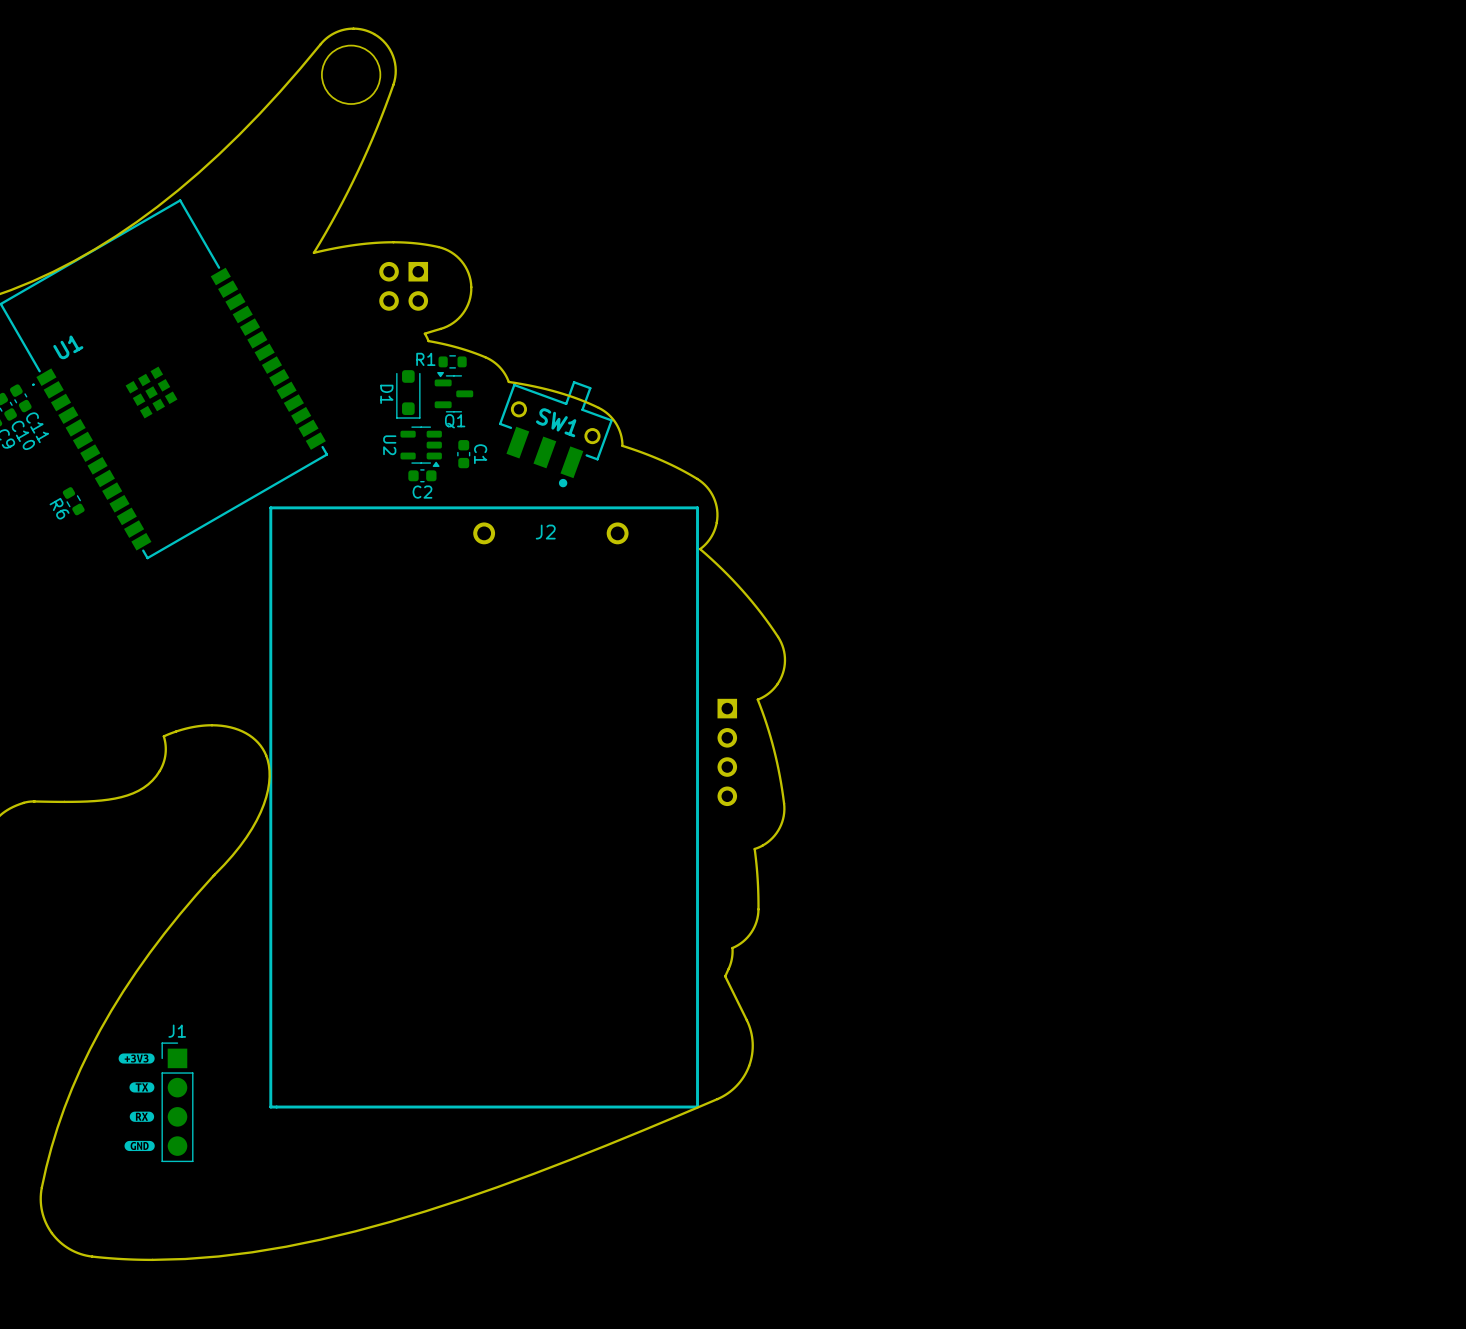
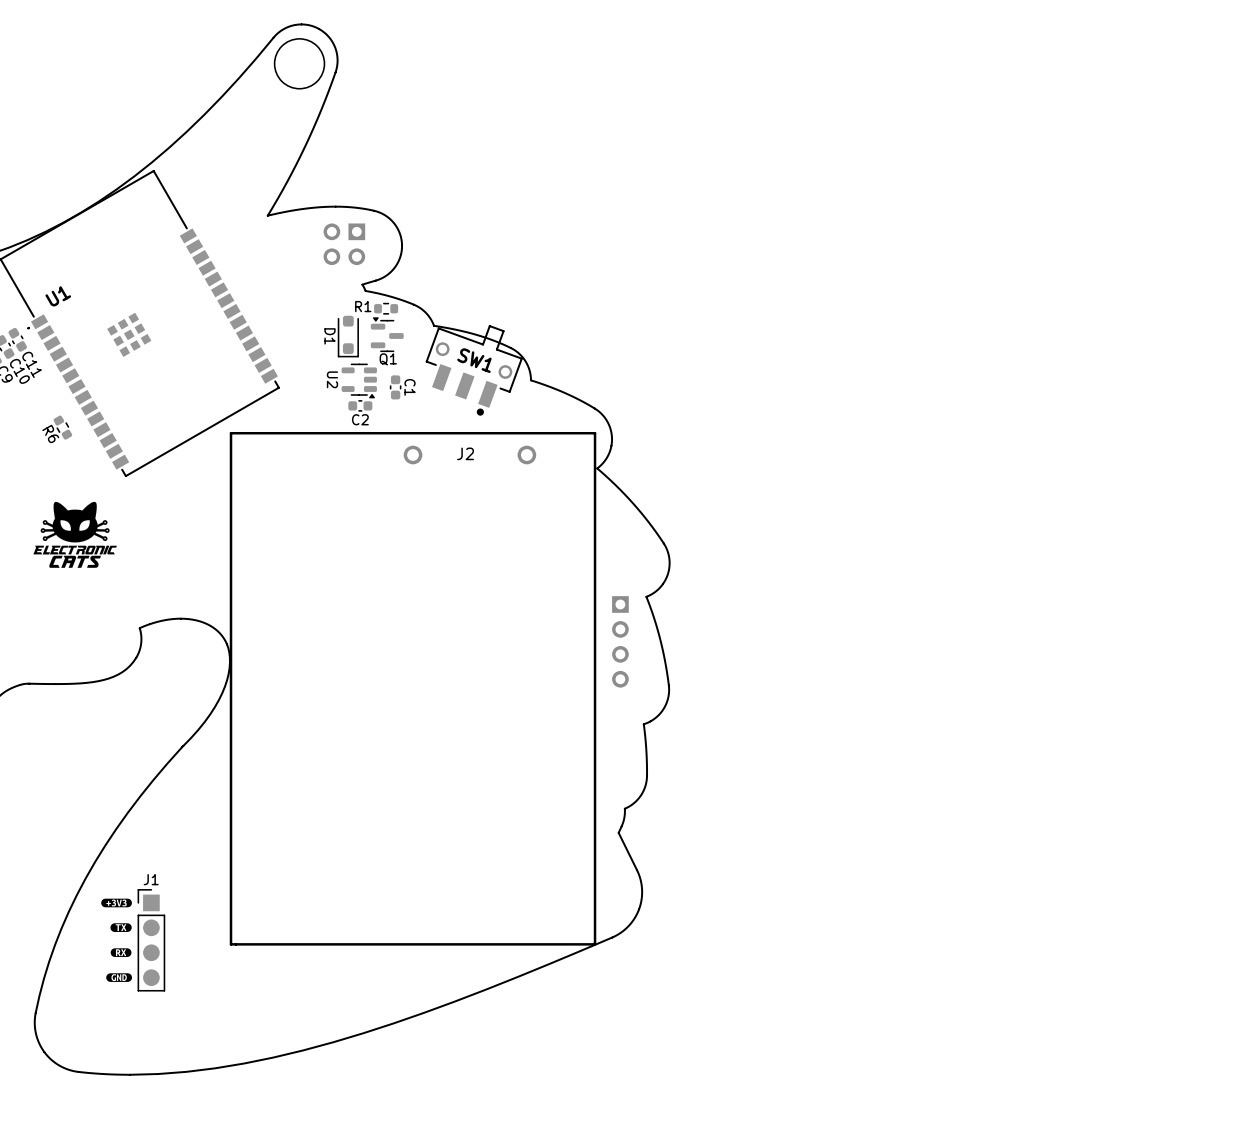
drawing: none -> [33, 501, 117, 568]

